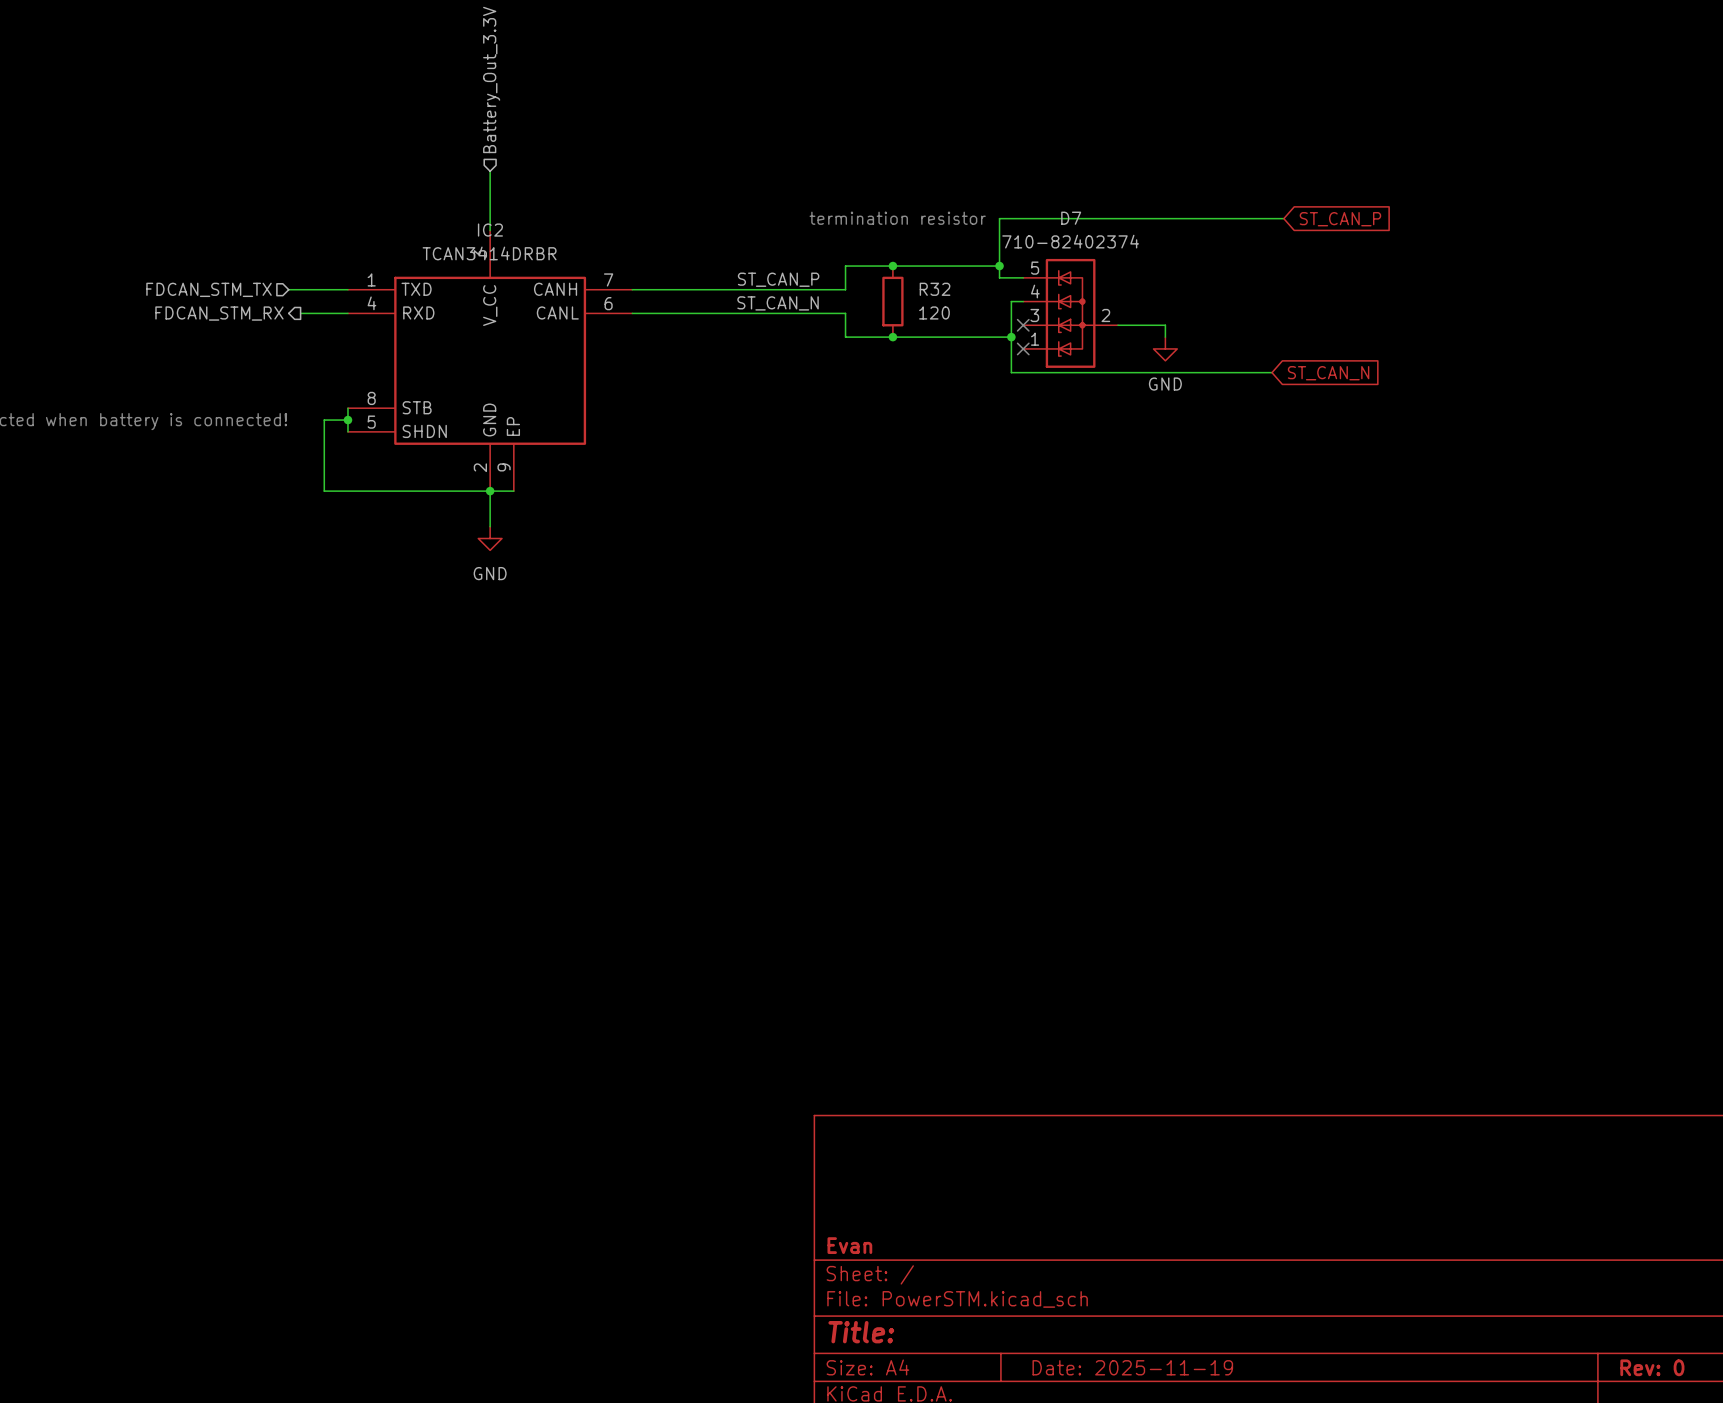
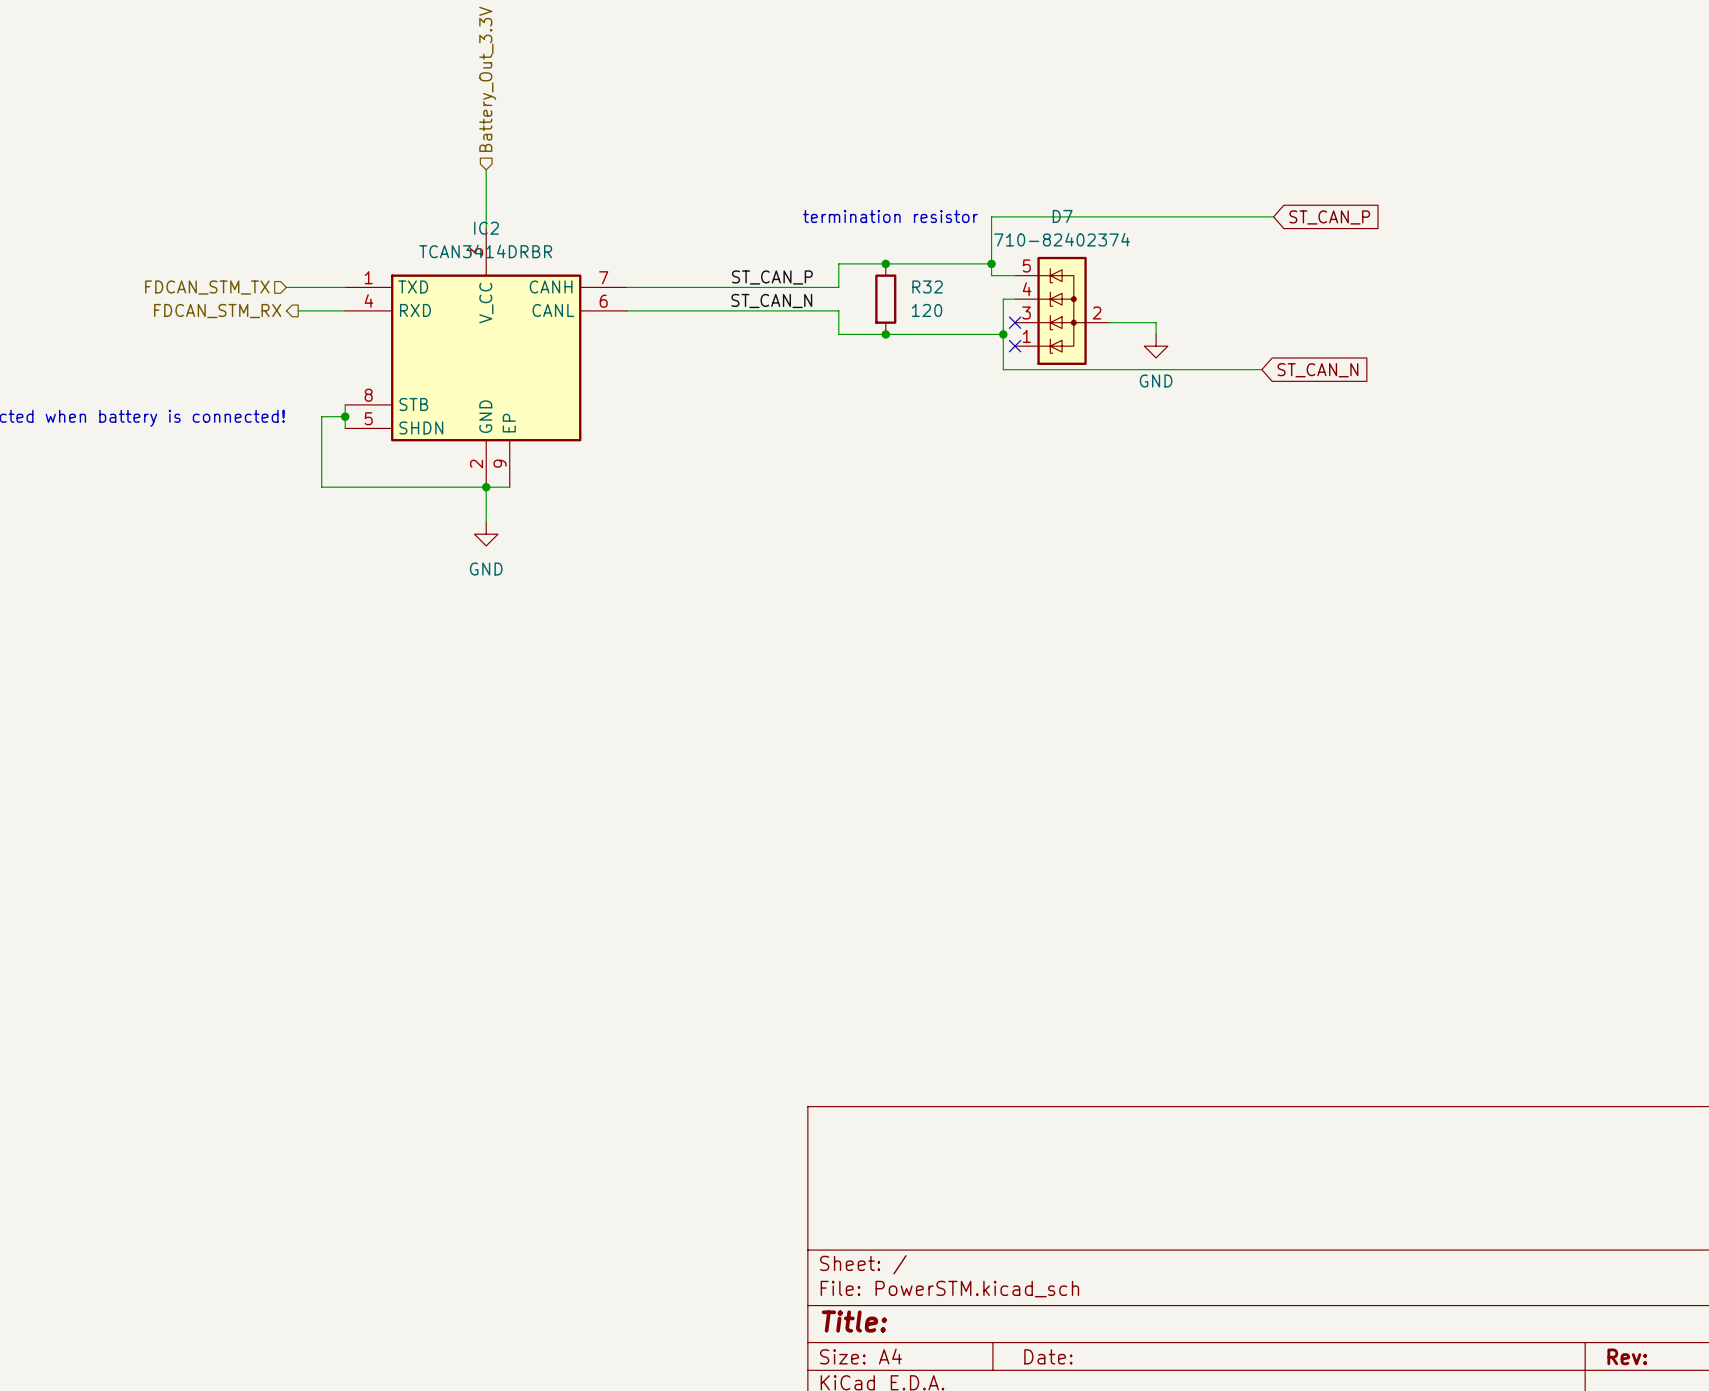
title block: Evan (849, 1245) -> none
title block: Date: 2025-11-19 (1132, 1367) -> Date: (1048, 1356)
title block: Rev: 0 (1652, 1367) -> Rev: (1627, 1356)

